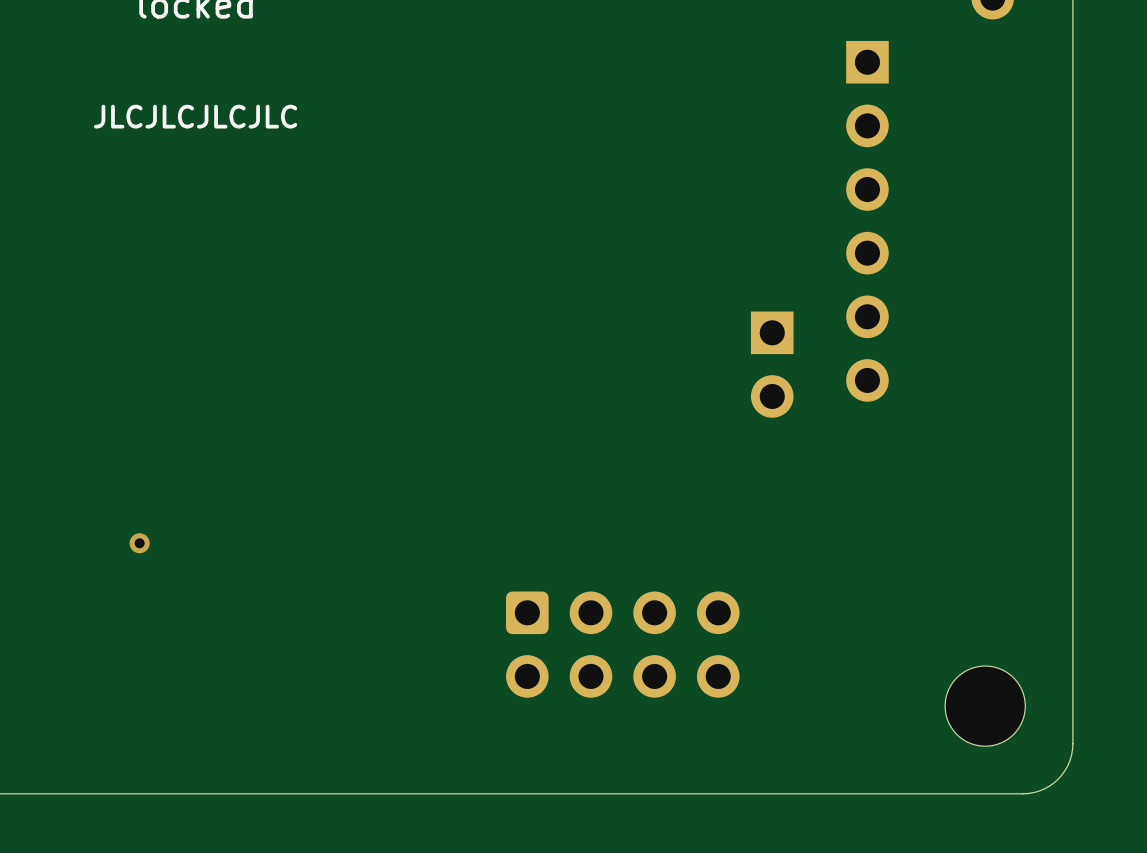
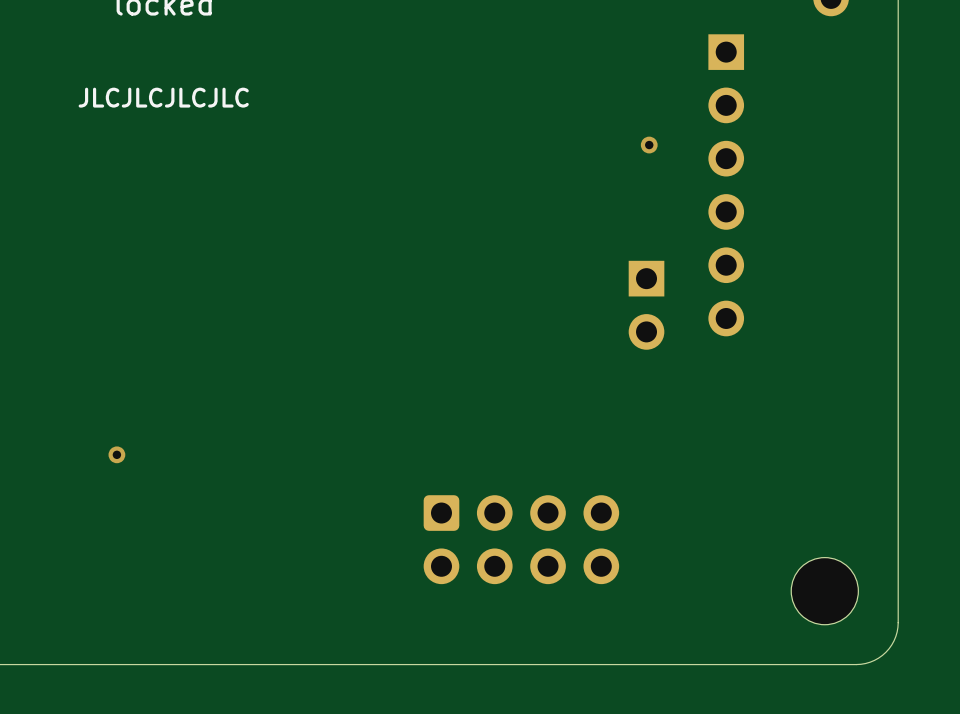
via: none -> (649, 145)

